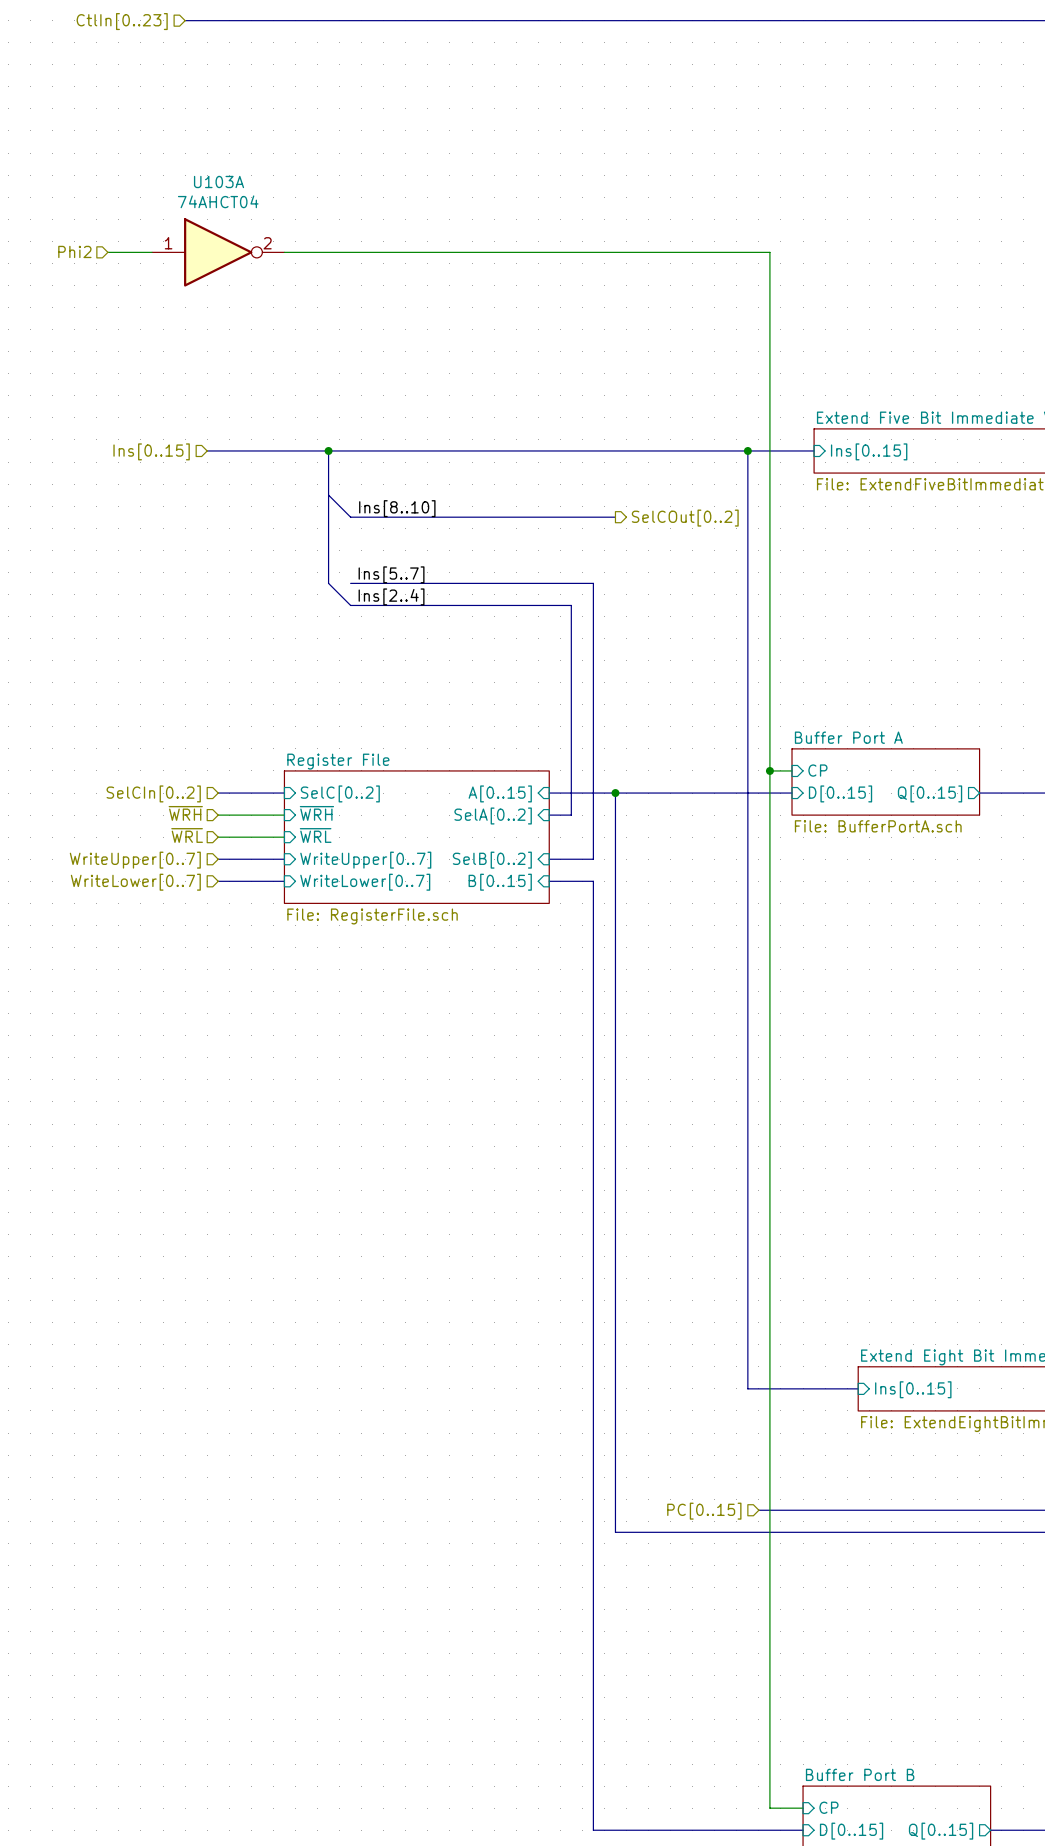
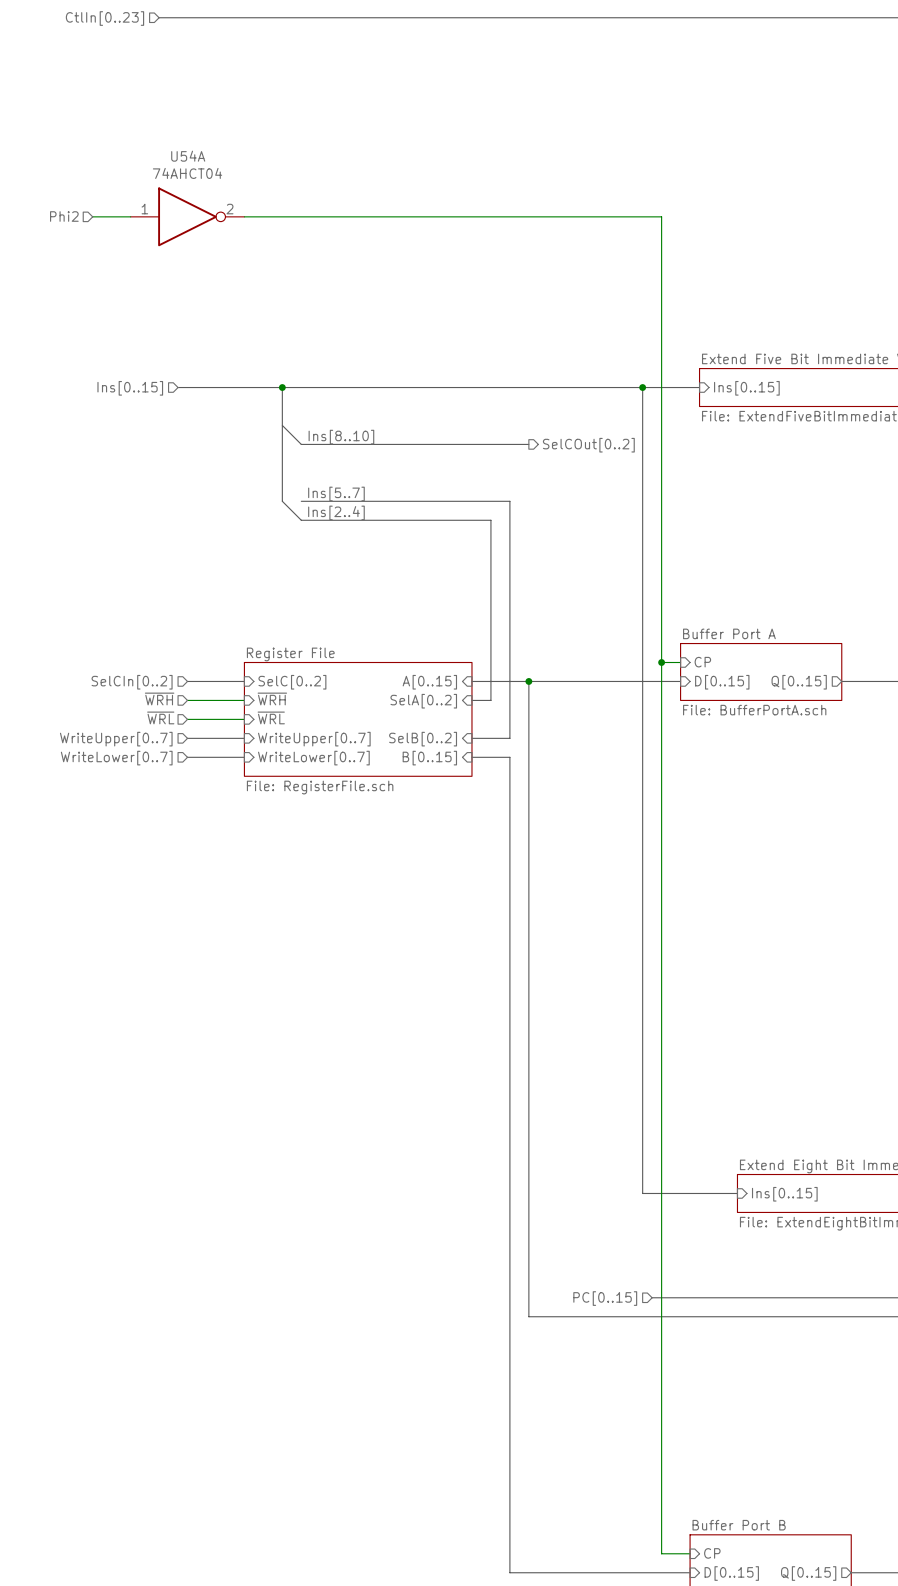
U103A name: U103A (219, 182) -> U54A (188, 156)

